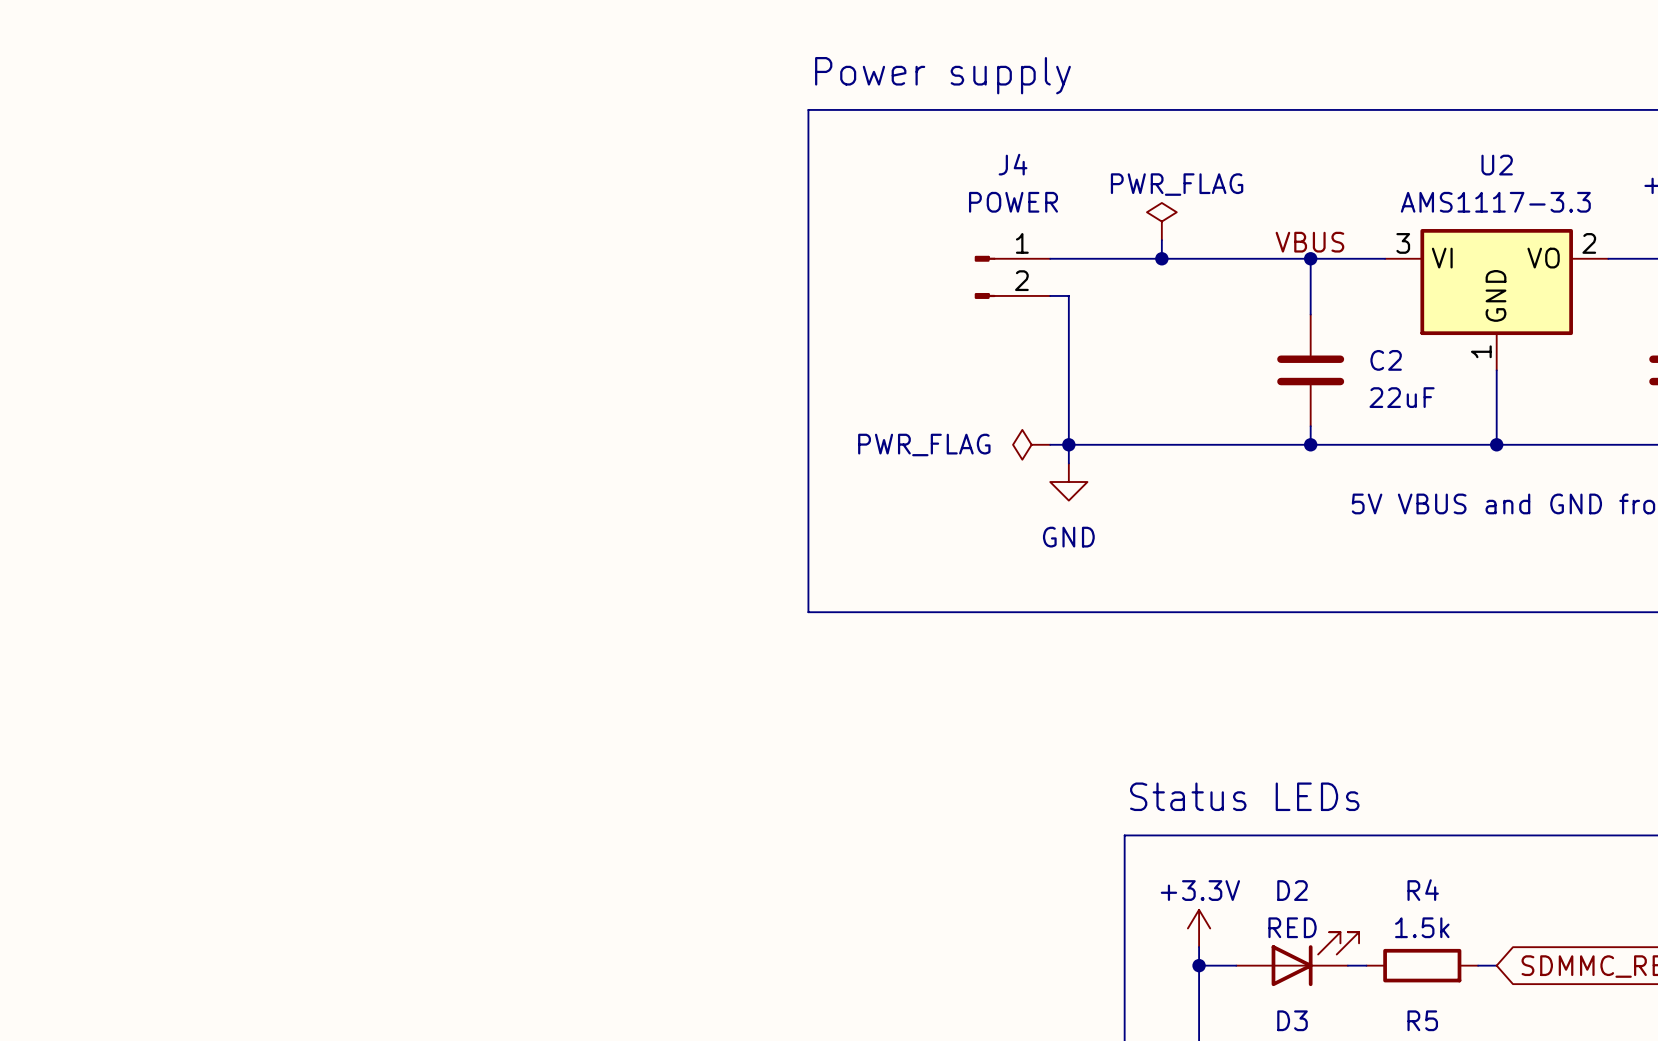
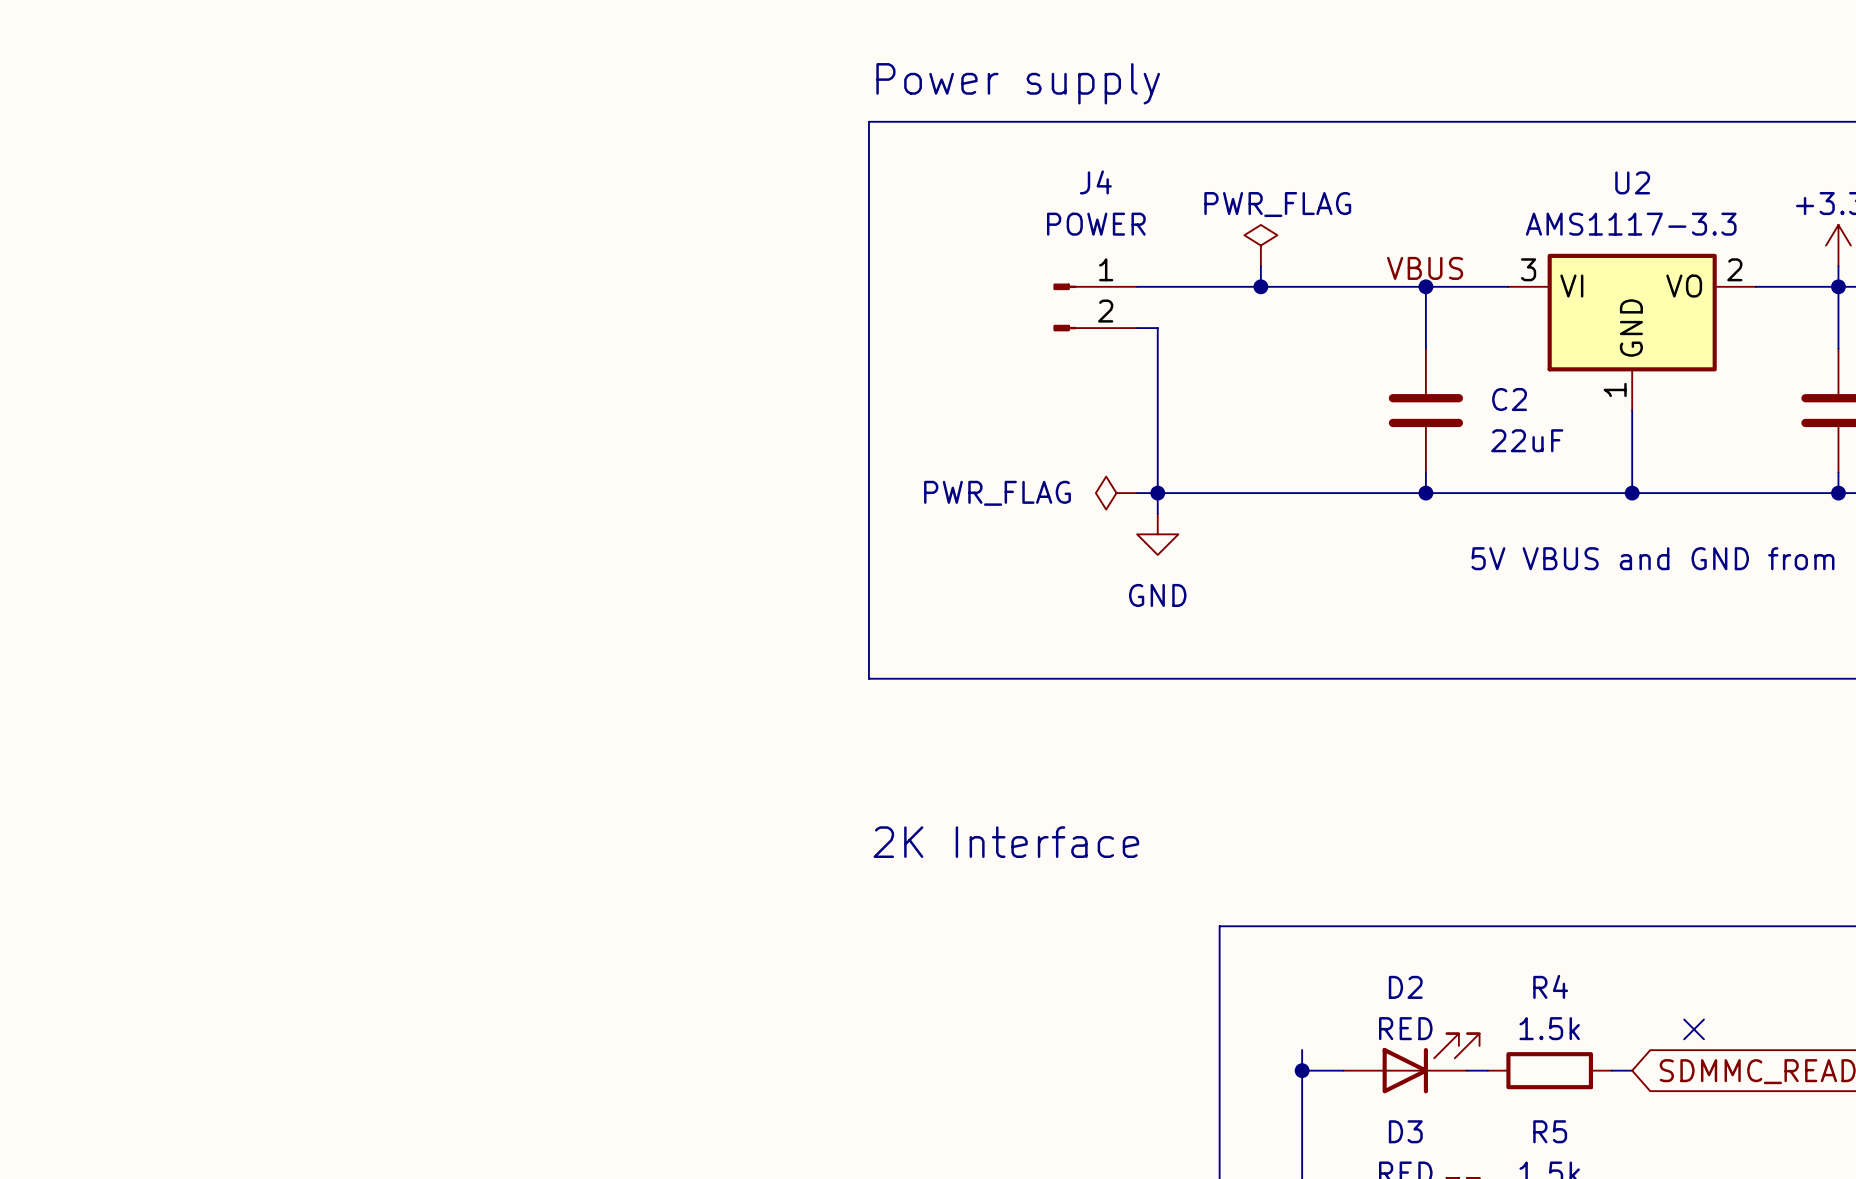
text: none -> 2K Interface (1006, 842)
text: Status LEDs (1244, 796) -> none
power symbol: +3.3V (1199, 928) -> none
no-connect mark: none -> (1694, 1029)

